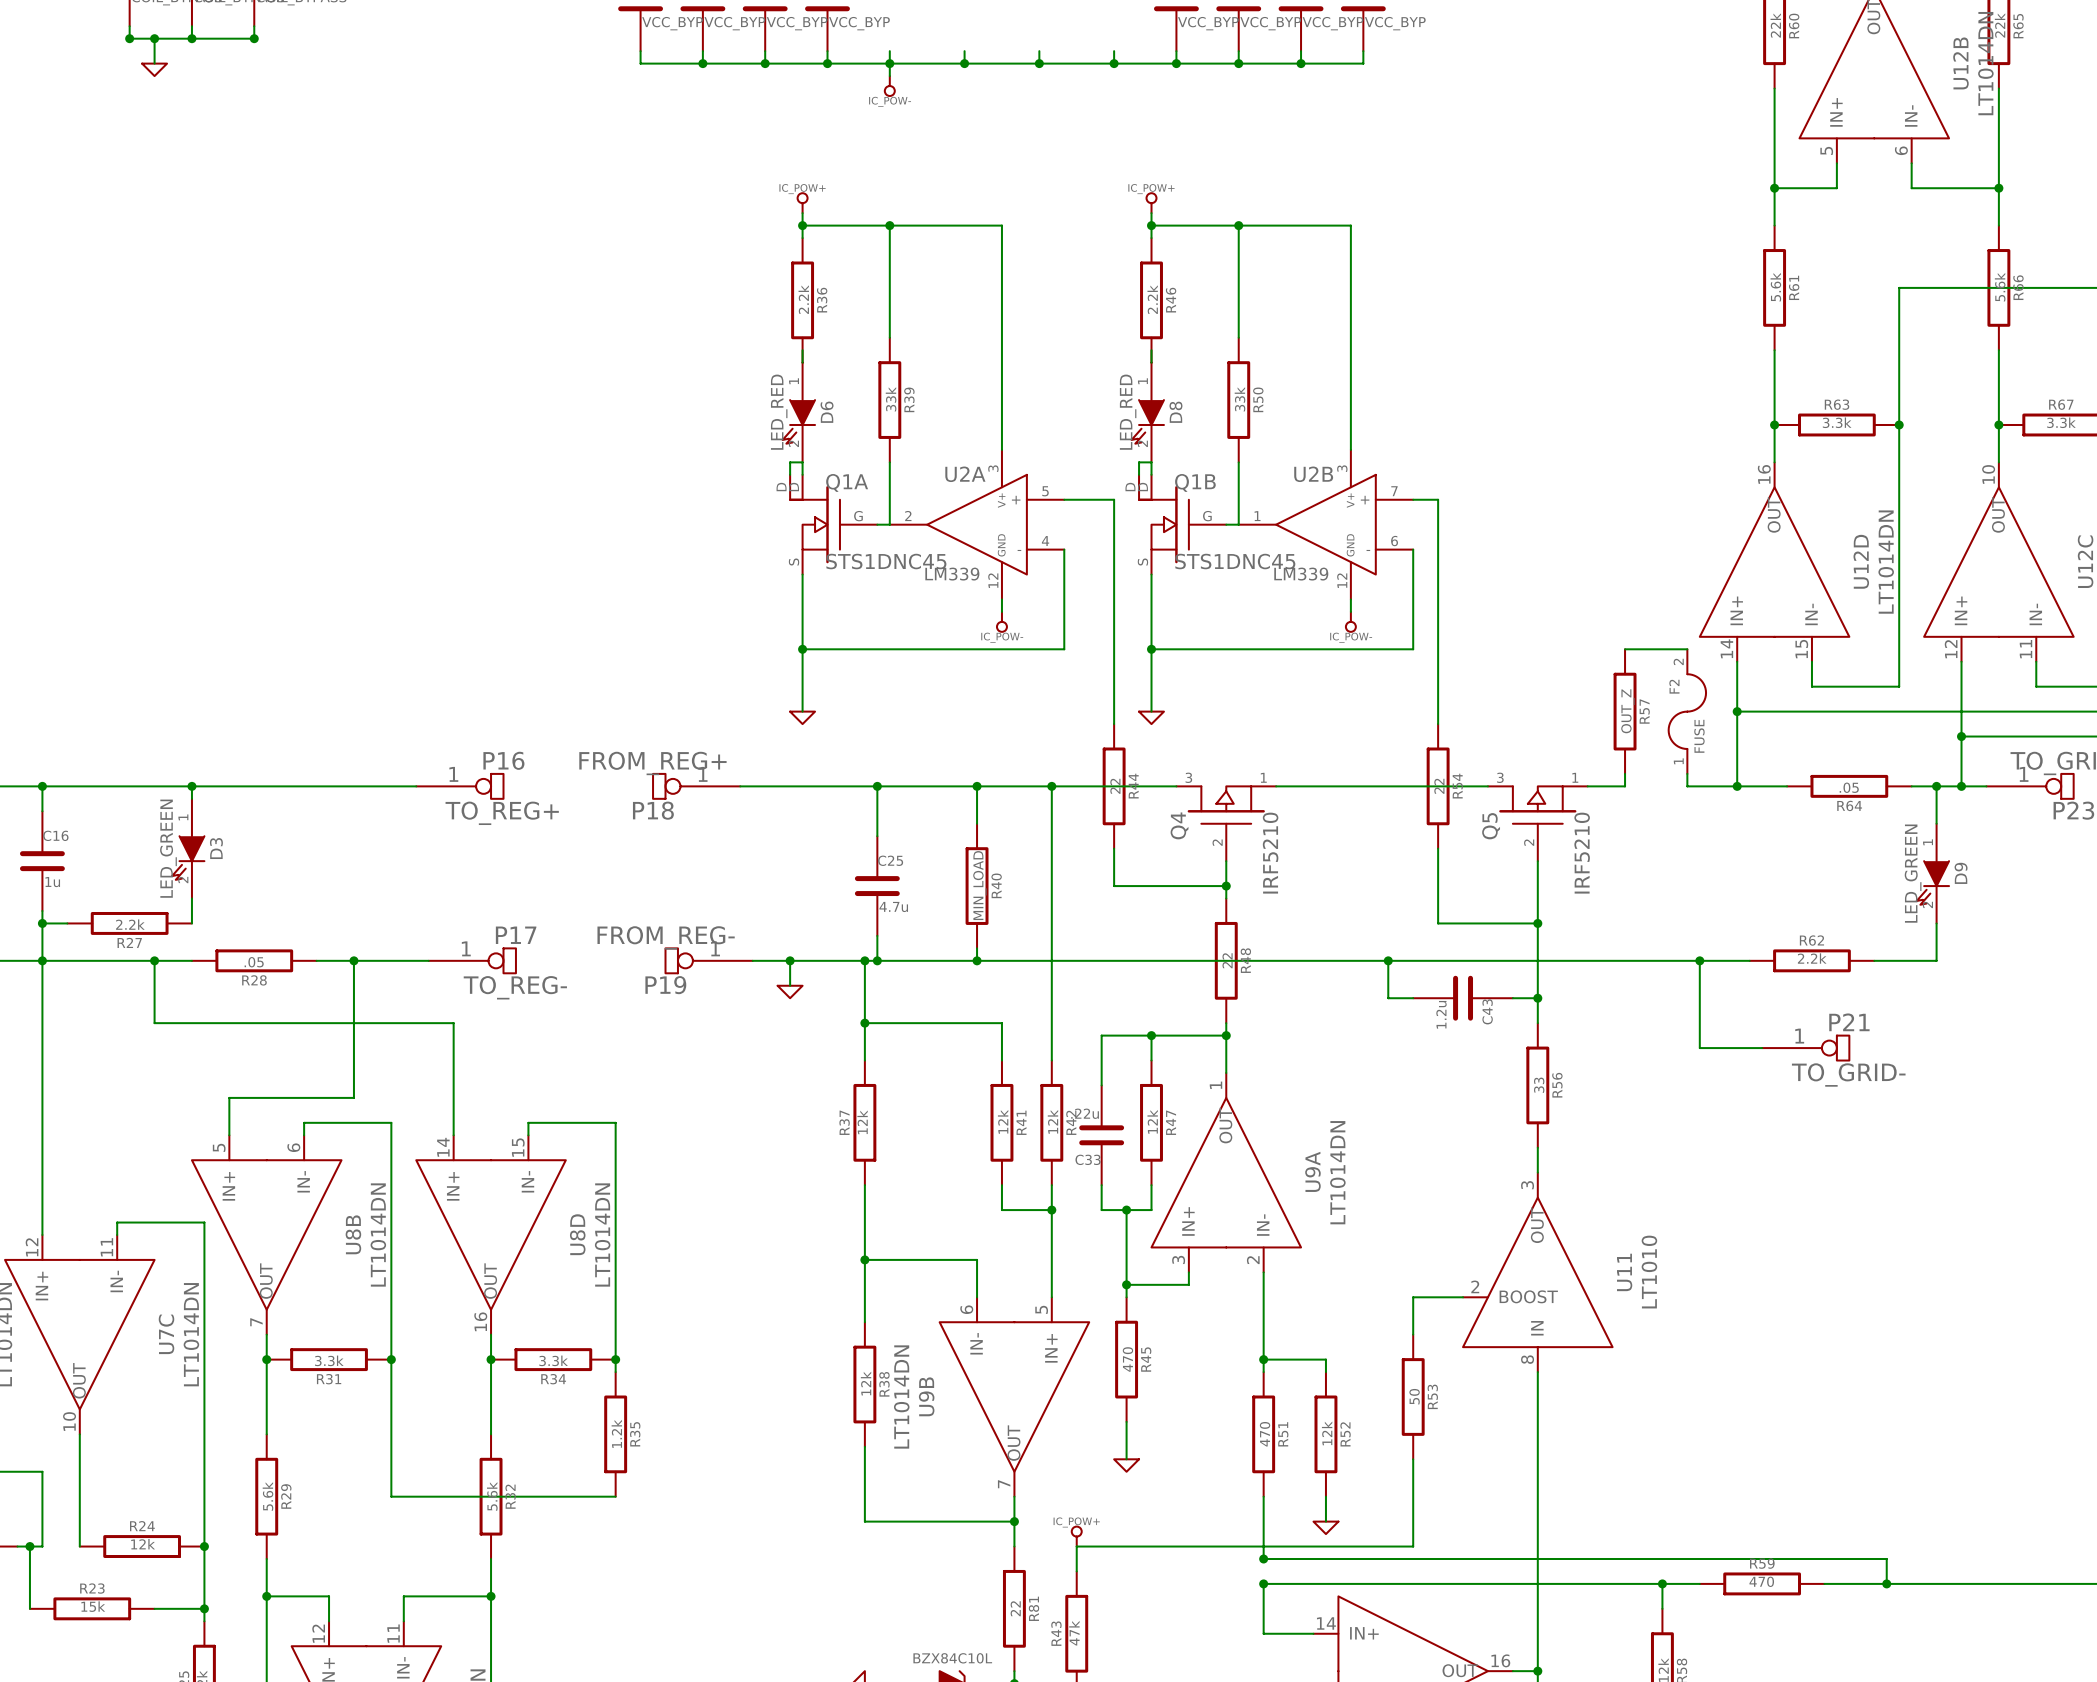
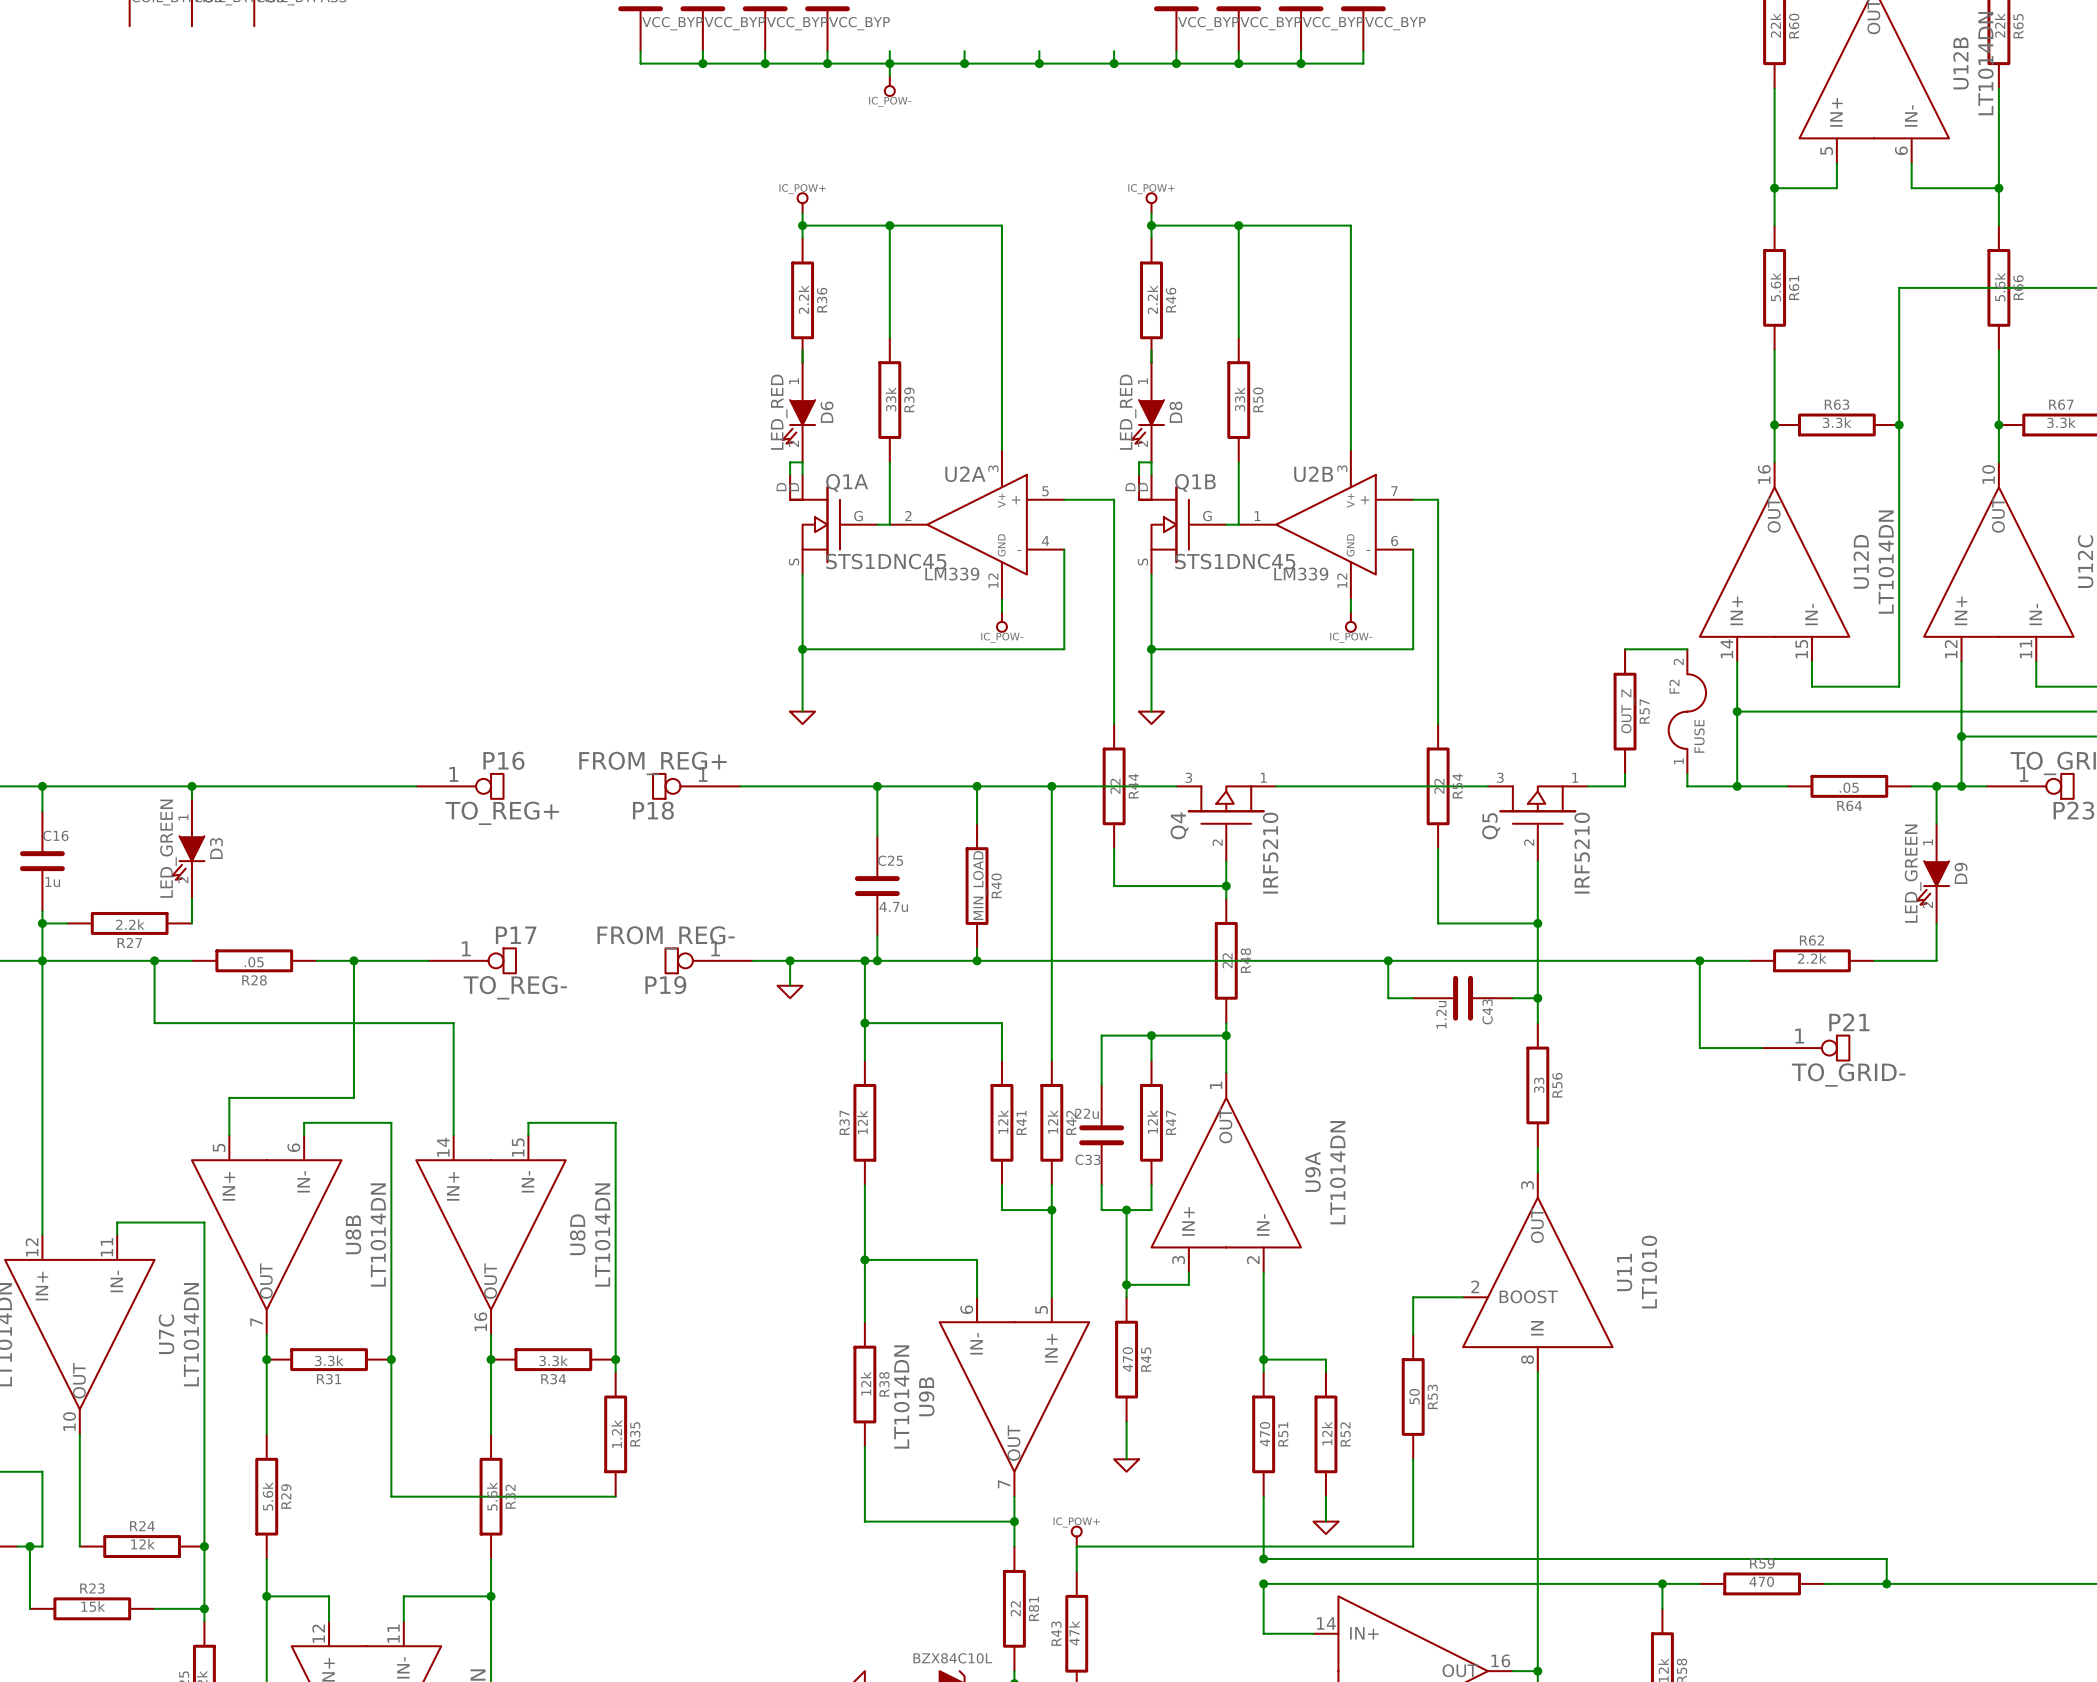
wire: (129, 26) (129, 38) (254, 38) (254, 26) -> none
wire: (191, 26) (191, 38) -> none
junction: (129, 38) -> none
wire: (154, 38) (154, 63) -> none
junction: (154, 38) -> none
junction: (191, 38) -> none
junction: (254, 38) -> none
power symbol: (154, 69) -> none

